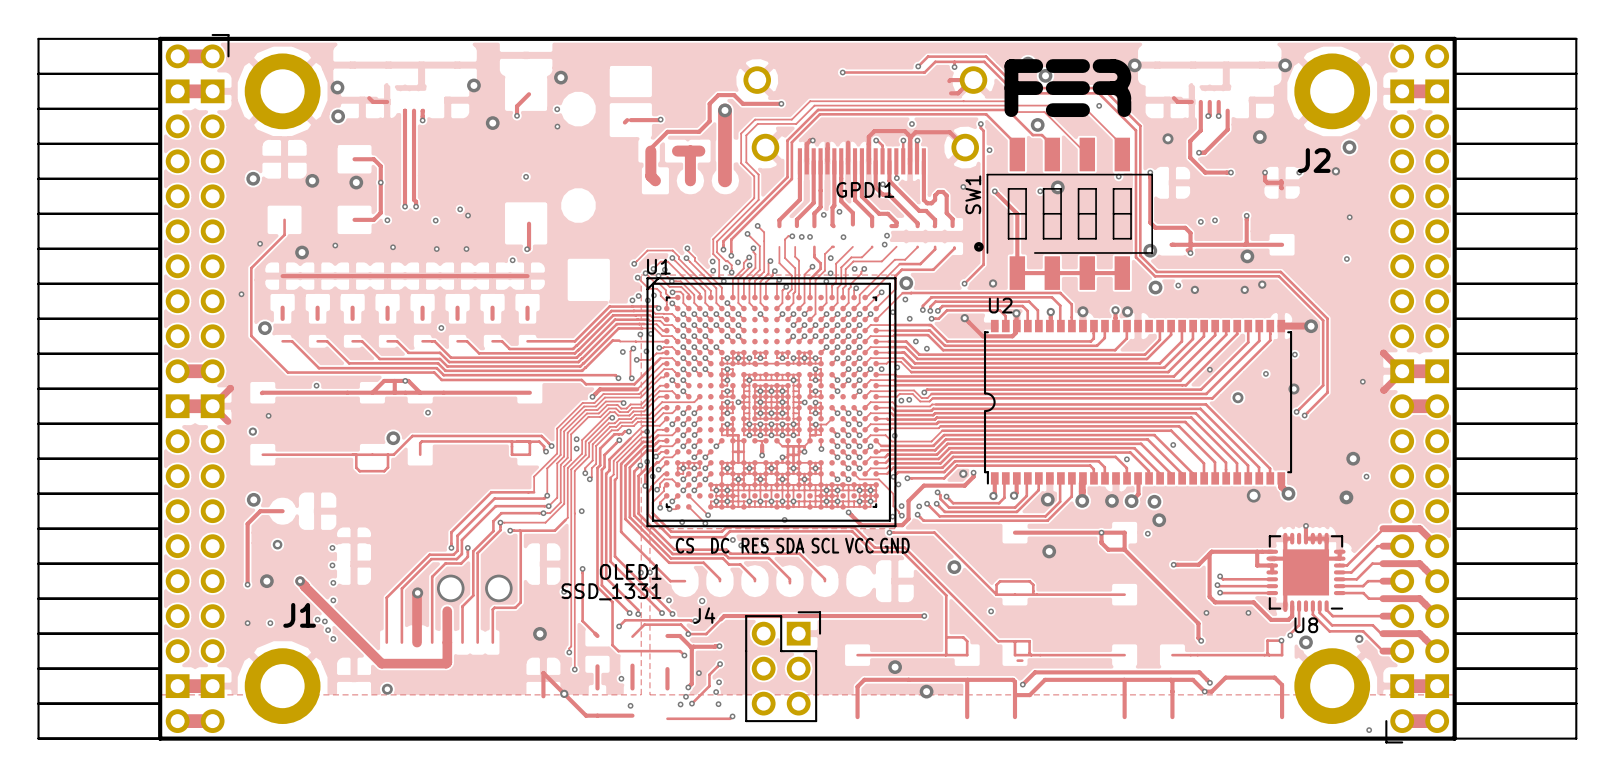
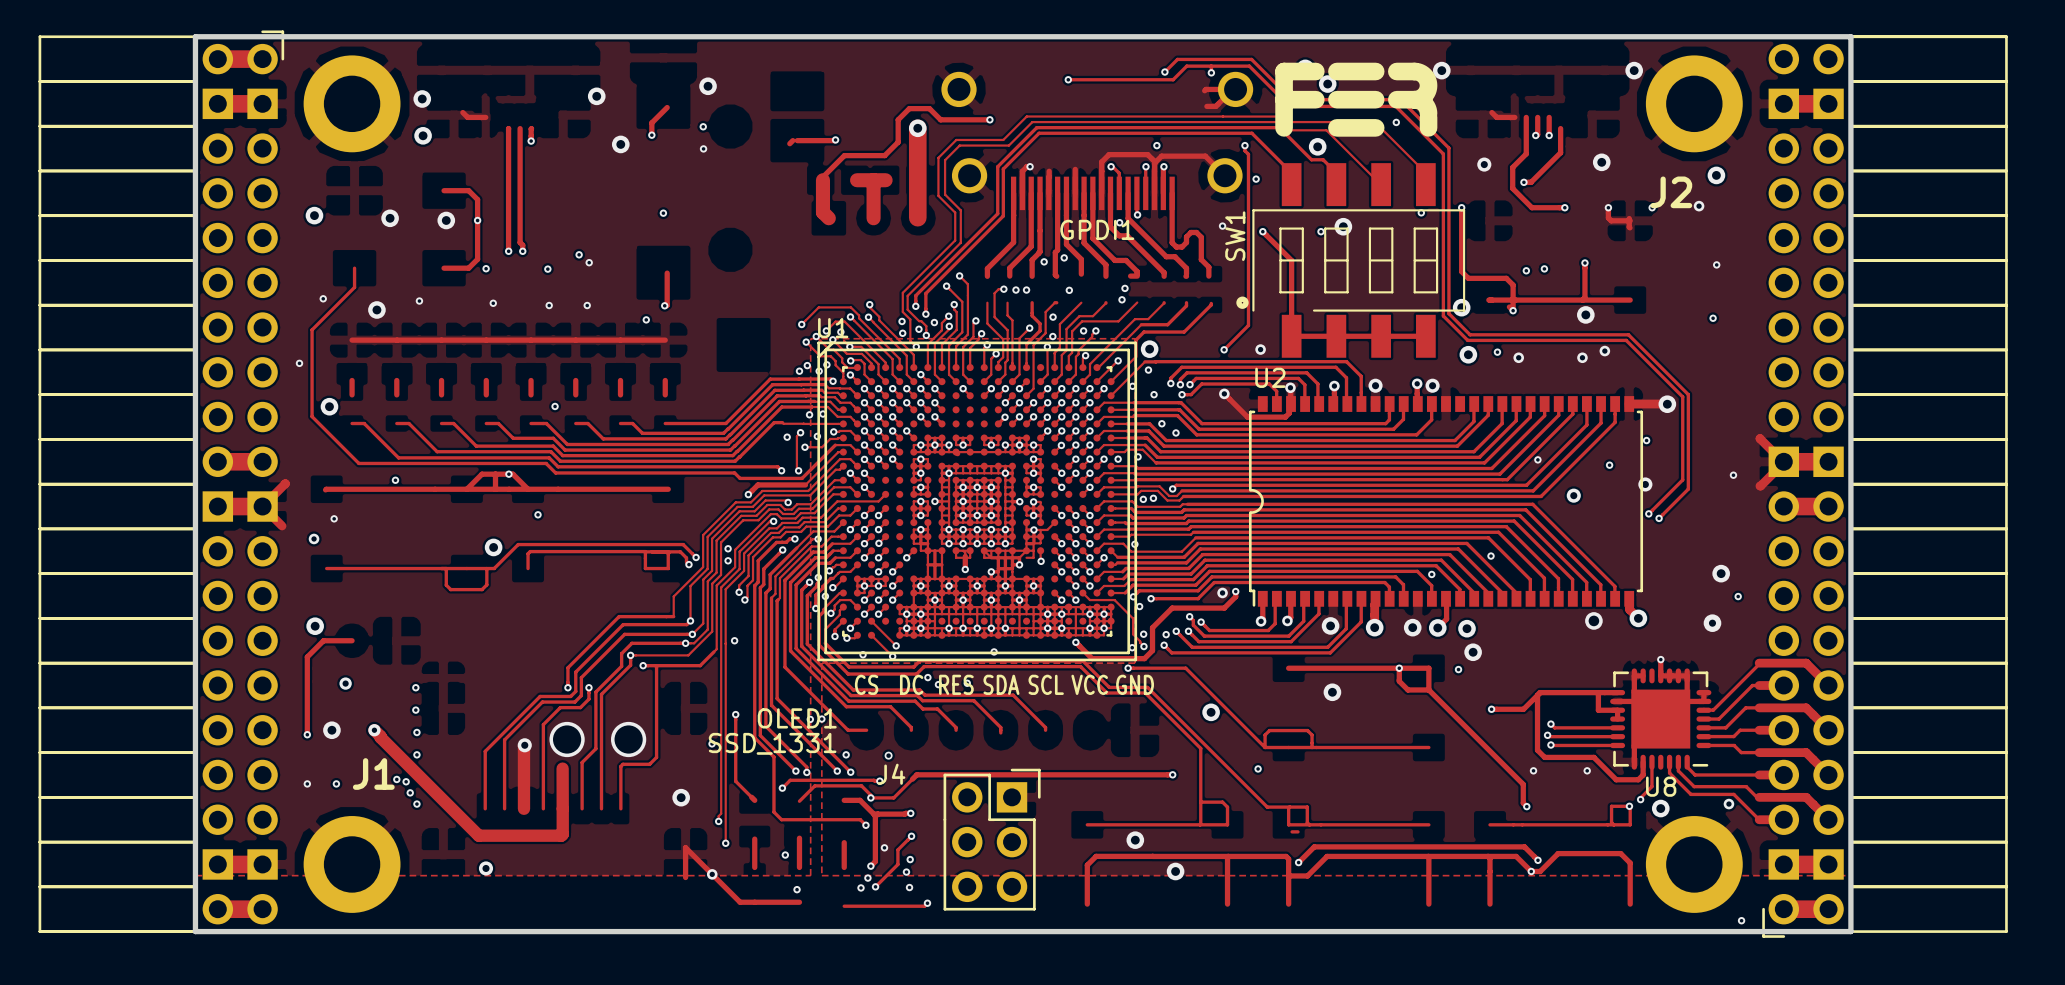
track: none -> (920, 543) (920, 550) (927, 550)
track: (732, 435) (738, 435) (738, 440) -> none
track: none -> (1033, 543) (1033, 557) (1026, 557)
track: none -> (956, 550) (956, 557) (970, 557) (970, 550)
track: none -> (991, 550) (991, 557) (984, 557) (984, 550) (1033, 550)
track: none -> (1005, 550) (1005, 557)

